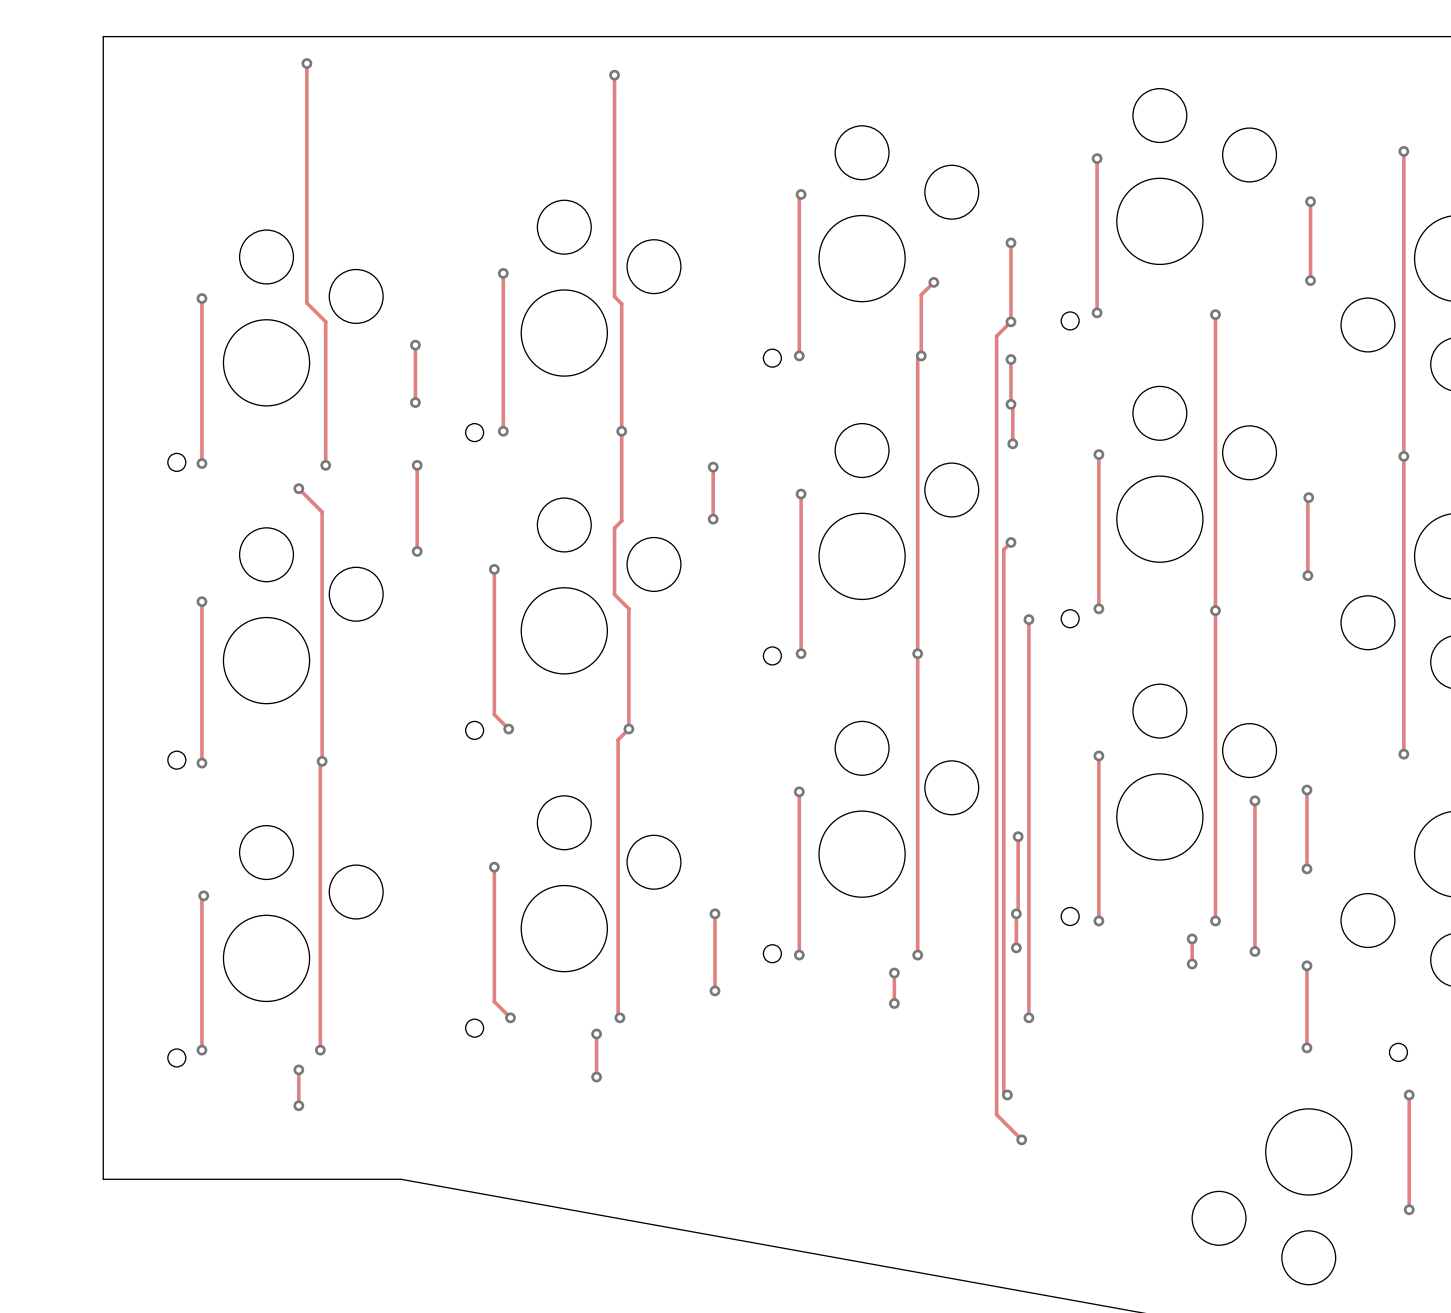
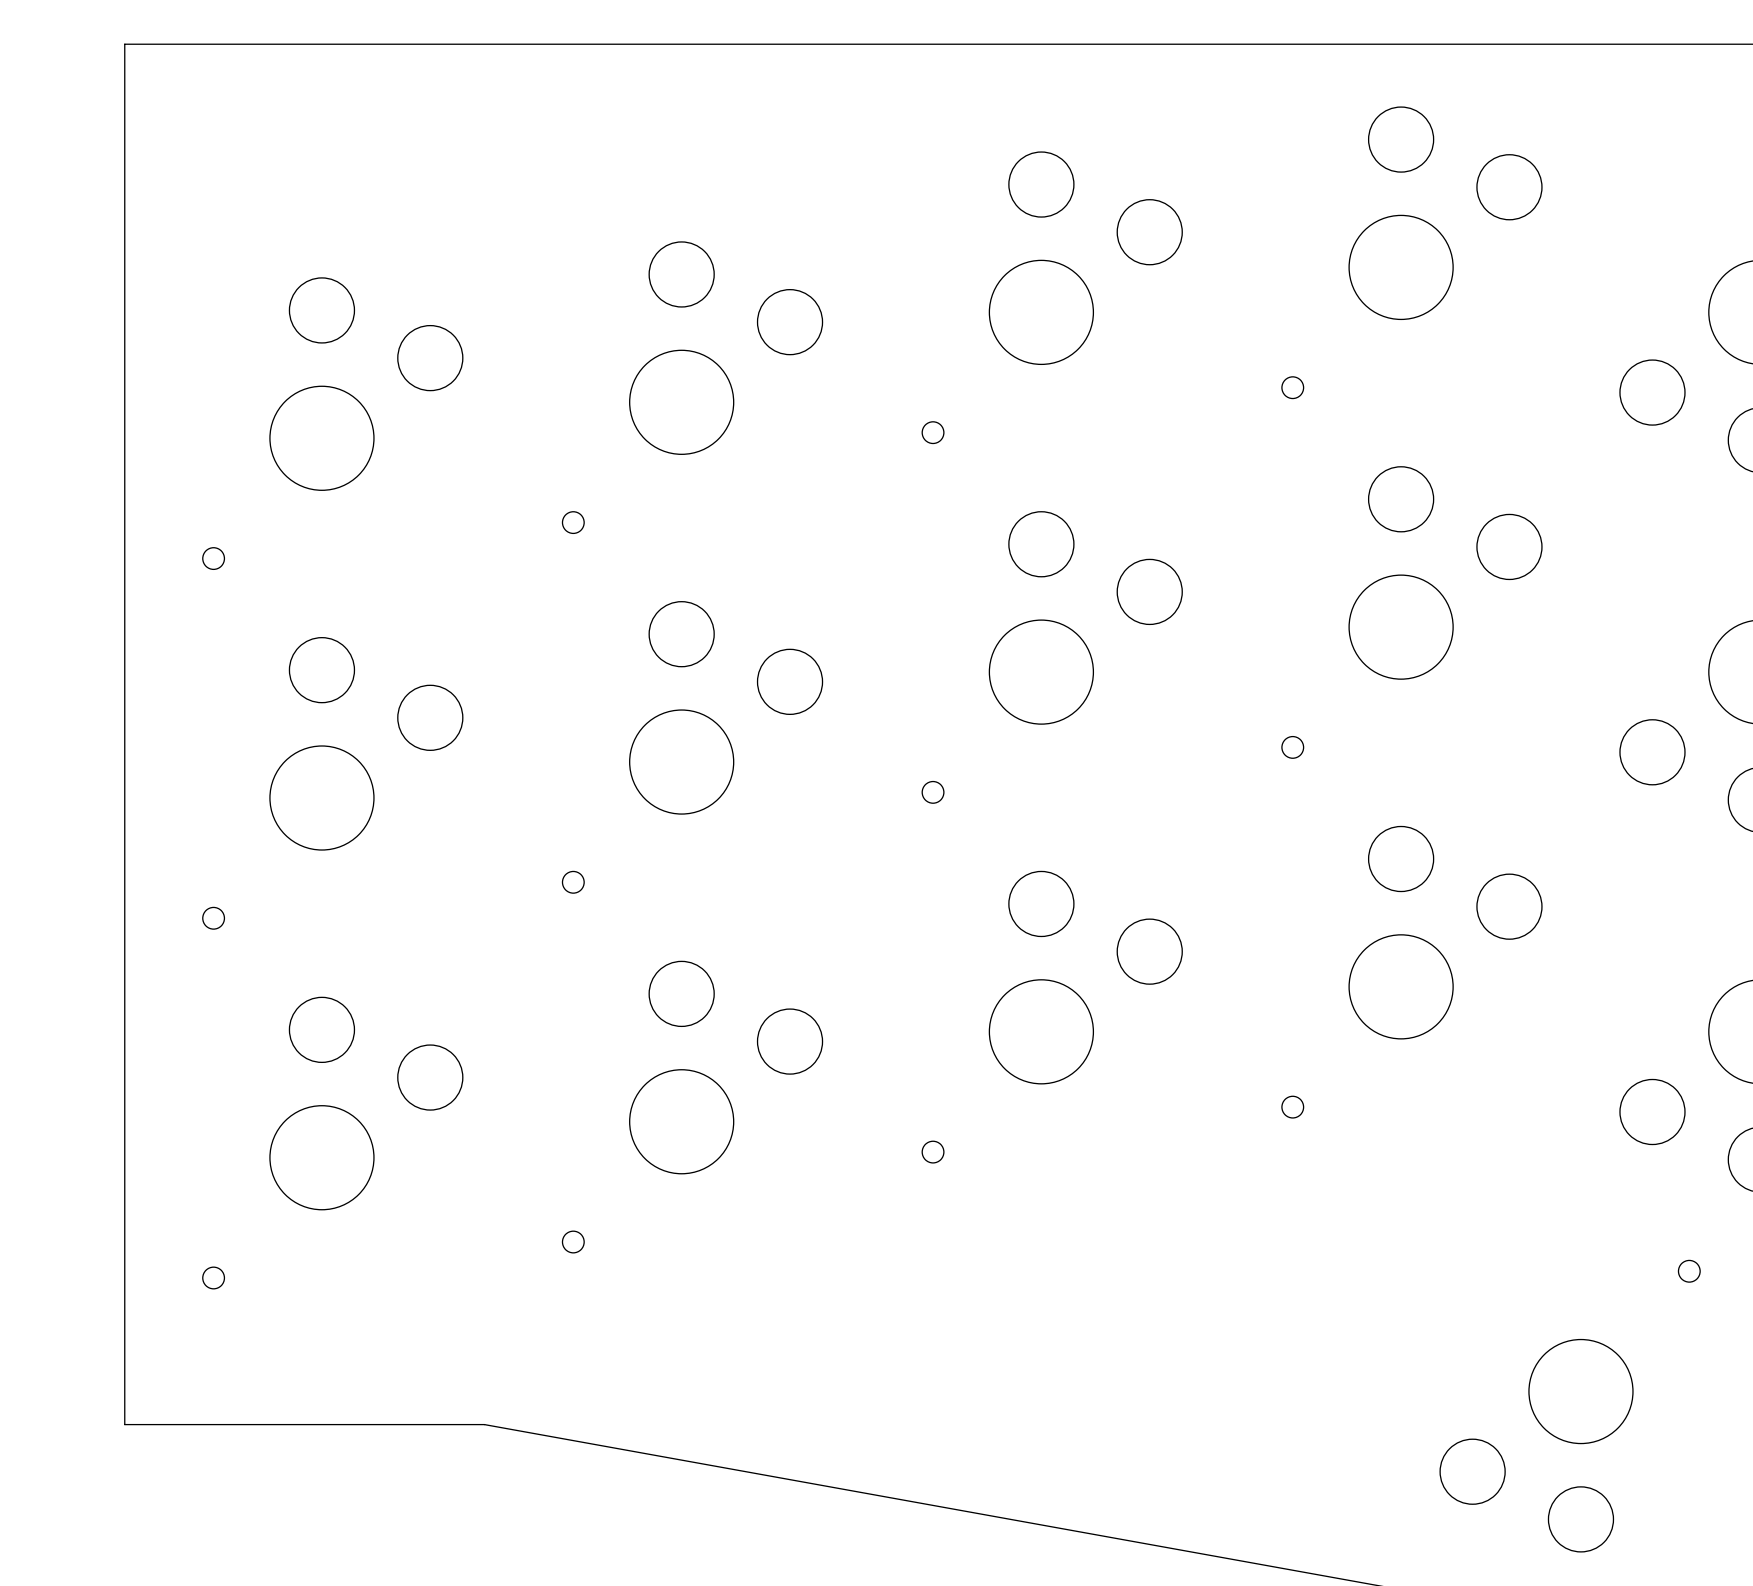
track: (306, 63) (306, 303) (325, 321) (325, 465) -> none
via: (306, 63) -> none
track: (614, 75) (614, 296) (621, 303) (621, 520) (614, 528) (614, 594) (628, 608) (628, 729) (618, 739) (618, 1016) (619, 1017) -> none
via: (614, 75) -> none
track: (1403, 151) (1403, 754) -> none
via: (1403, 151) -> none
track: (1097, 158) (1097, 312) -> none
via: (1097, 158) -> none
track: (801, 194) (799, 196) (799, 355) -> none
via: (801, 194) -> none
track: (1310, 201) (1310, 280) -> none
via: (1310, 201) -> none
track: (1010, 242) (1010, 321) (996, 336) (996, 1114) (1021, 1139) -> none
via: (1010, 242) -> none
track: (503, 273) (503, 431) -> none
via: (503, 273) -> none
via: (1310, 280) -> none
track: (933, 282) (921, 294) (921, 355) (917, 359) (917, 955) -> none
via: (933, 282) -> none
track: (201, 298) (201, 463) -> none
via: (201, 298) -> none
via: (1097, 312) -> none
track: (1215, 314) (1215, 920) -> none
via: (1215, 314) -> none
via: (1010, 321) -> none
track: (415, 345) (415, 402) -> none
via: (415, 345) -> none
via: (799, 355) -> none
via: (921, 355) -> none
track: (1010, 359) (1012, 443) -> none
via: (1010, 359) -> none
via: (415, 402) -> none
via: (1010, 404) -> none
via: (503, 431) -> none
via: (621, 431) -> none
via: (1012, 443) -> none
track: (1098, 454) (1098, 608) -> none
via: (1098, 454) -> none
via: (1403, 456) -> none
via: (201, 463) -> none
via: (325, 465) -> none
track: (417, 465) (417, 551) -> none
via: (417, 465) -> none
track: (713, 467) (713, 519) -> none
via: (713, 467) -> none
track: (298, 488) (322, 511) (320, 1050) -> none
via: (298, 488) -> none
track: (801, 494) (801, 653) -> none
via: (801, 494) -> none
track: (1308, 497) (1307, 575) -> none
via: (1308, 497) -> none
via: (713, 519) -> none
track: (1010, 542) (1003, 549) (1003, 1091) (1007, 1094) -> none
via: (1010, 542) -> none
via: (417, 551) -> none
track: (494, 569) (494, 714) (508, 729) -> none
via: (494, 569) -> none
via: (1307, 575) -> none
track: (201, 601) (201, 763) -> none
via: (201, 601) -> none
via: (1098, 608) -> none
via: (1215, 610) -> none
track: (1028, 619) (1028, 1017) -> none
via: (1028, 619) -> none
via: (801, 653) -> none
via: (917, 653) -> none
via: (508, 729) -> none
via: (628, 729) -> none
via: (1403, 754) -> none
track: (1098, 755) (1098, 920) -> none
via: (1098, 755) -> none
via: (322, 761) -> none
via: (201, 763) -> none
track: (1306, 790) (1306, 868) -> none
via: (1306, 790) -> none
track: (799, 791) (799, 955) -> none
via: (799, 791) -> none
track: (1254, 800) (1254, 951) -> none
via: (1254, 800) -> none
track: (1018, 836) (1016, 947) -> none
via: (1018, 836) -> none
track: (494, 867) (494, 1001) (510, 1017) -> none
via: (494, 867) -> none
via: (1306, 868) -> none
track: (203, 895) (201, 897) (201, 1050) -> none
via: (203, 895) -> none
track: (714, 913) (714, 990) -> none
via: (714, 913) -> none
via: (1016, 913) -> none
via: (1098, 920) -> none
via: (1215, 920) -> none
track: (1192, 938) (1192, 964) -> none
via: (1192, 938) -> none
via: (1016, 947) -> none
via: (1254, 951) -> none
via: (799, 955) -> none
via: (917, 955) -> none
via: (1192, 964) -> none
track: (1306, 965) (1306, 1047) -> none
via: (1306, 965) -> none
track: (894, 973) (894, 1003) -> none
via: (894, 973) -> none
via: (714, 990) -> none
via: (894, 1003) -> none
via: (510, 1017) -> none
via: (619, 1017) -> none
via: (1028, 1017) -> none
track: (596, 1034) (596, 1077) -> none
via: (596, 1034) -> none
via: (1306, 1047) -> none
via: (201, 1050) -> none
via: (320, 1050) -> none
track: (298, 1069) (298, 1105) -> none
via: (298, 1069) -> none
via: (596, 1077) -> none
via: (1007, 1094) -> none
track: (1409, 1094) (1409, 1209) -> none
via: (1409, 1094) -> none
via: (298, 1105) -> none
via: (1021, 1139) -> none
via: (1409, 1209) -> none

